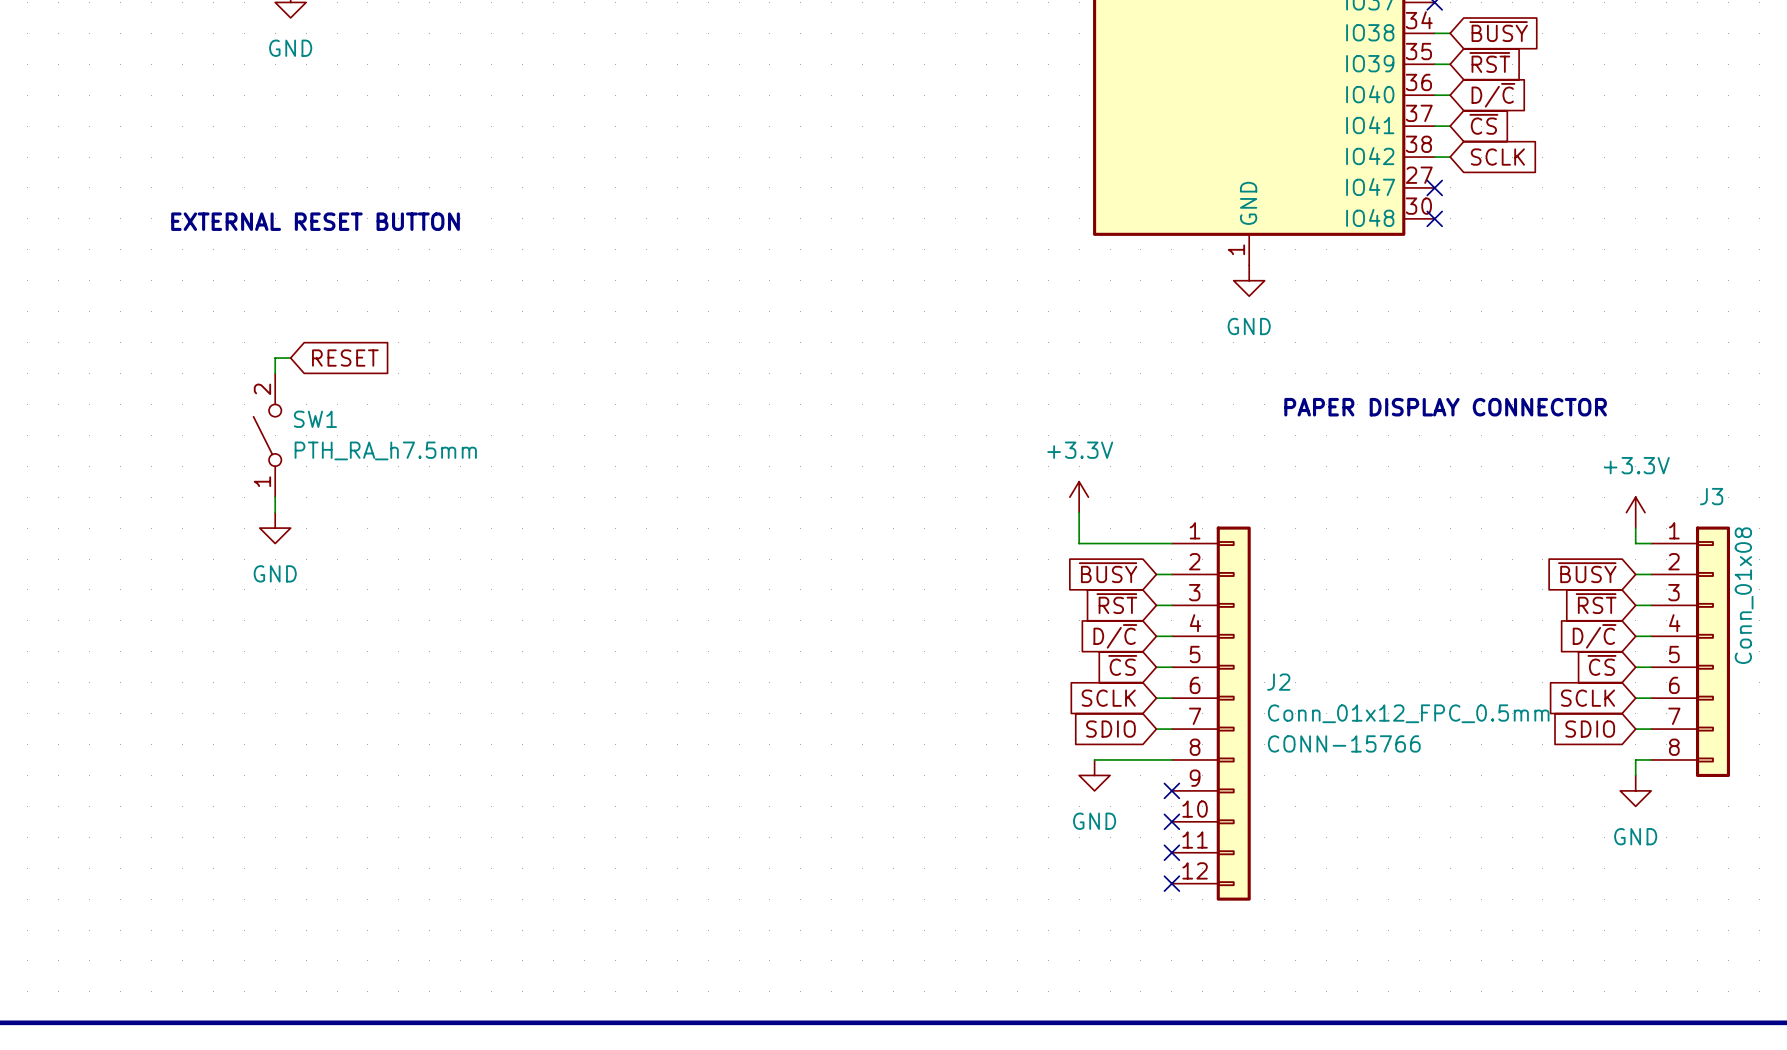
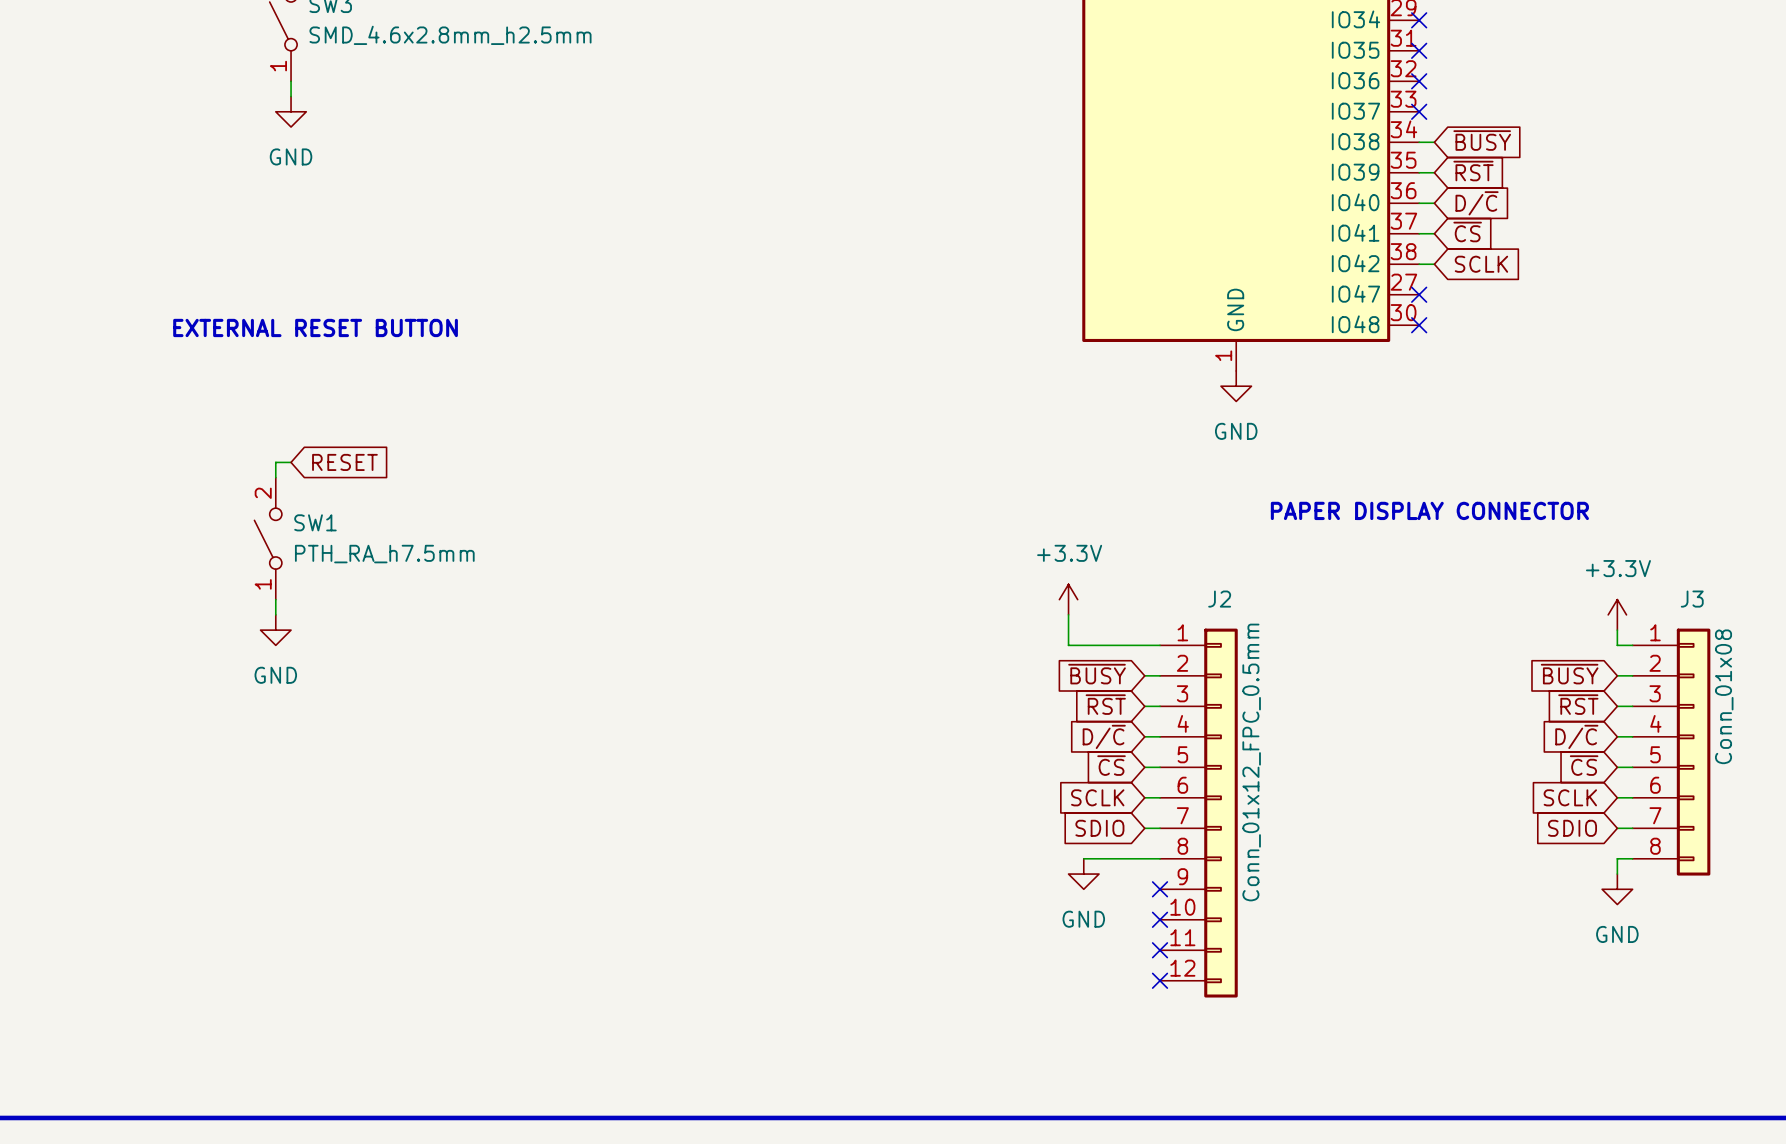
J2 name position: J2 (1278, 682) -> J2 (1219, 599)
J2 value rotation: 0° (1408, 713) -> 90° counterclockwise (1251, 762)
J2 text: CONN-15766 (1344, 743) -> none

